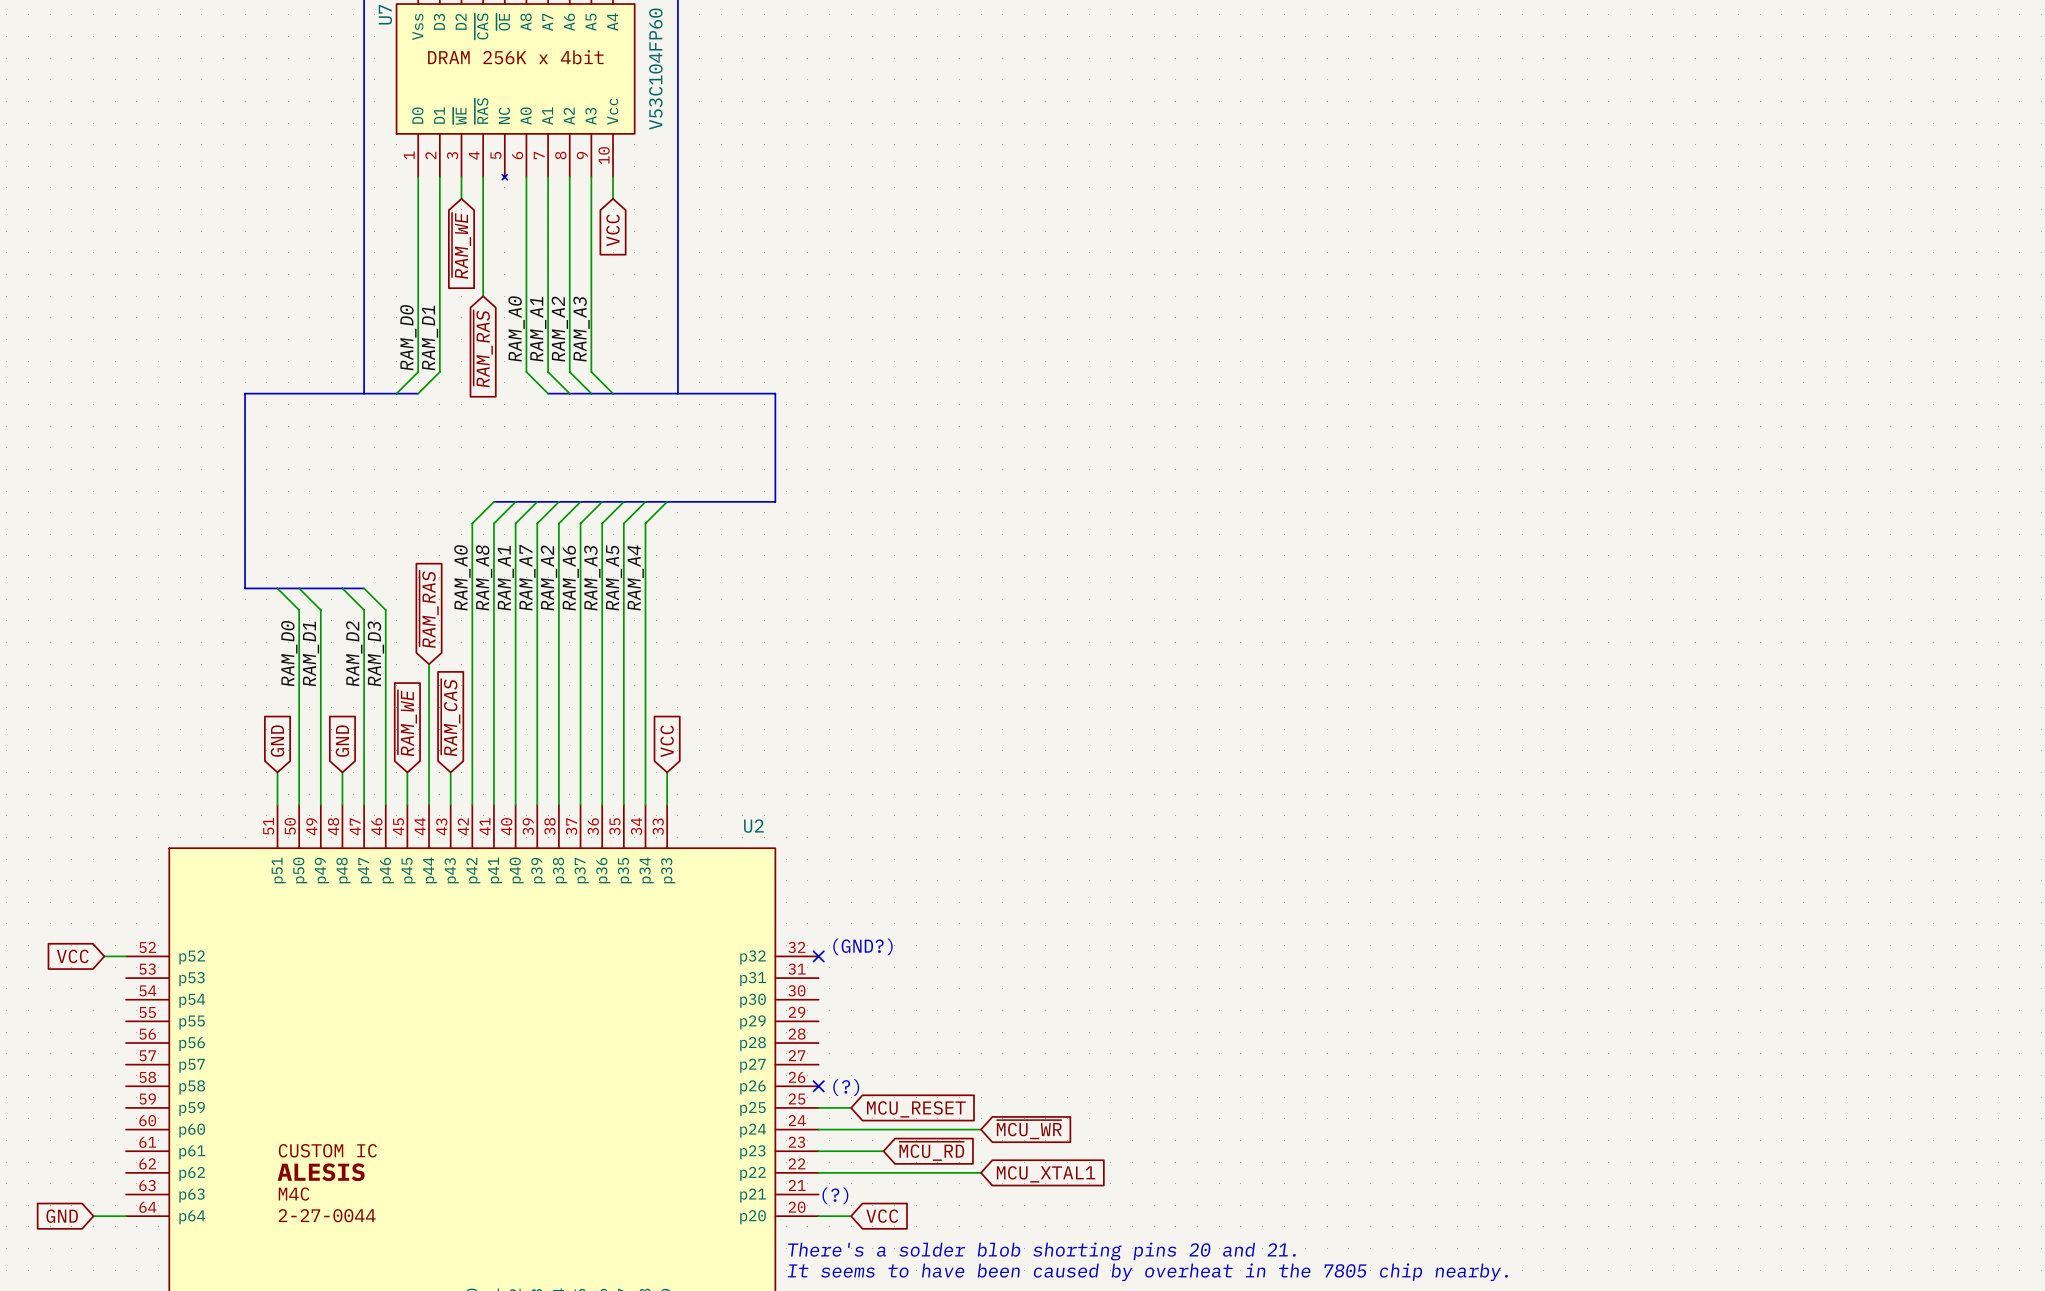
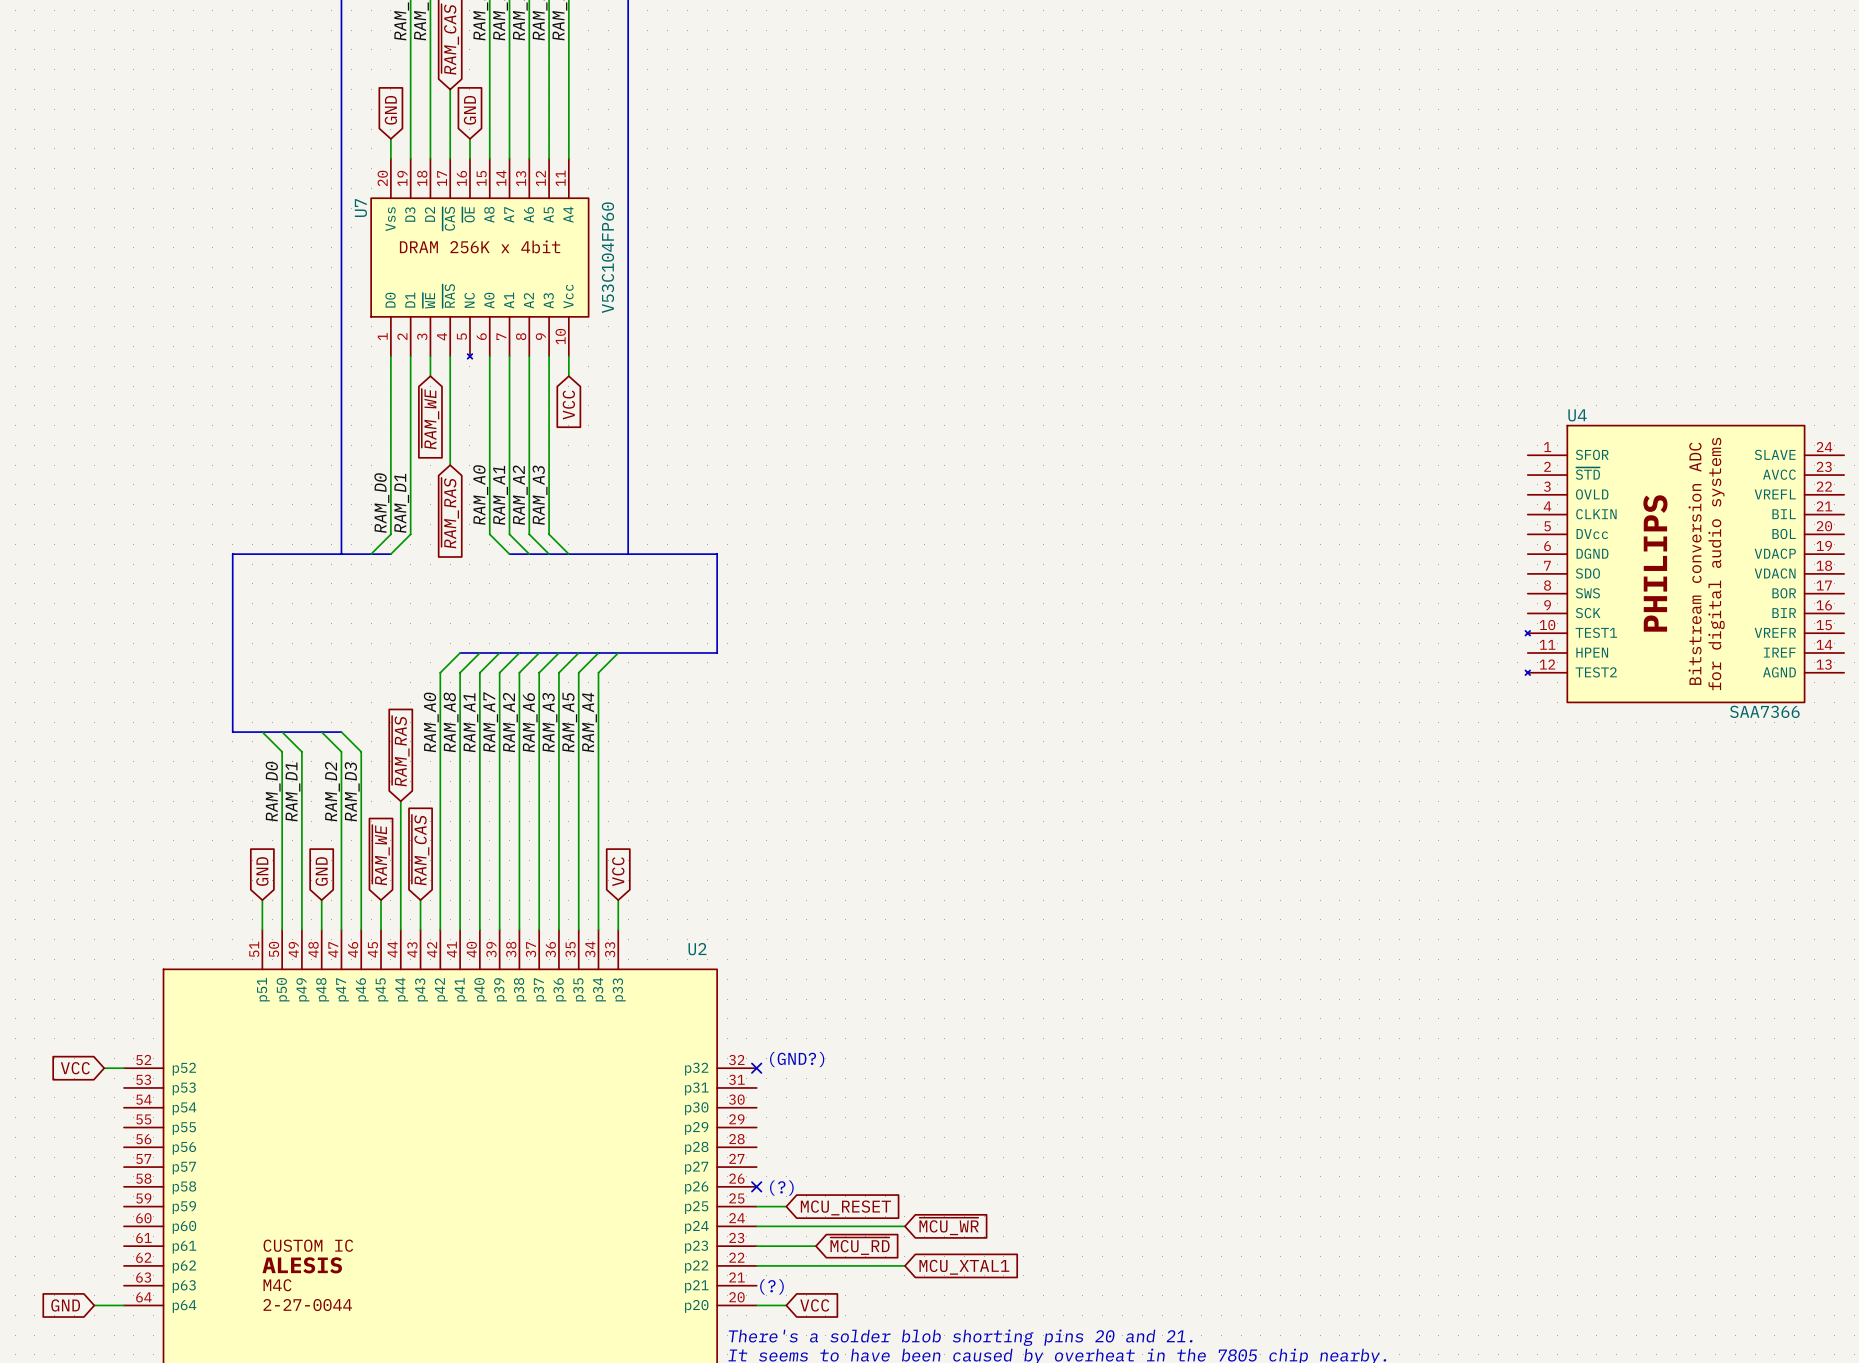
U4: none -> SAA7366 (1684, 564)

